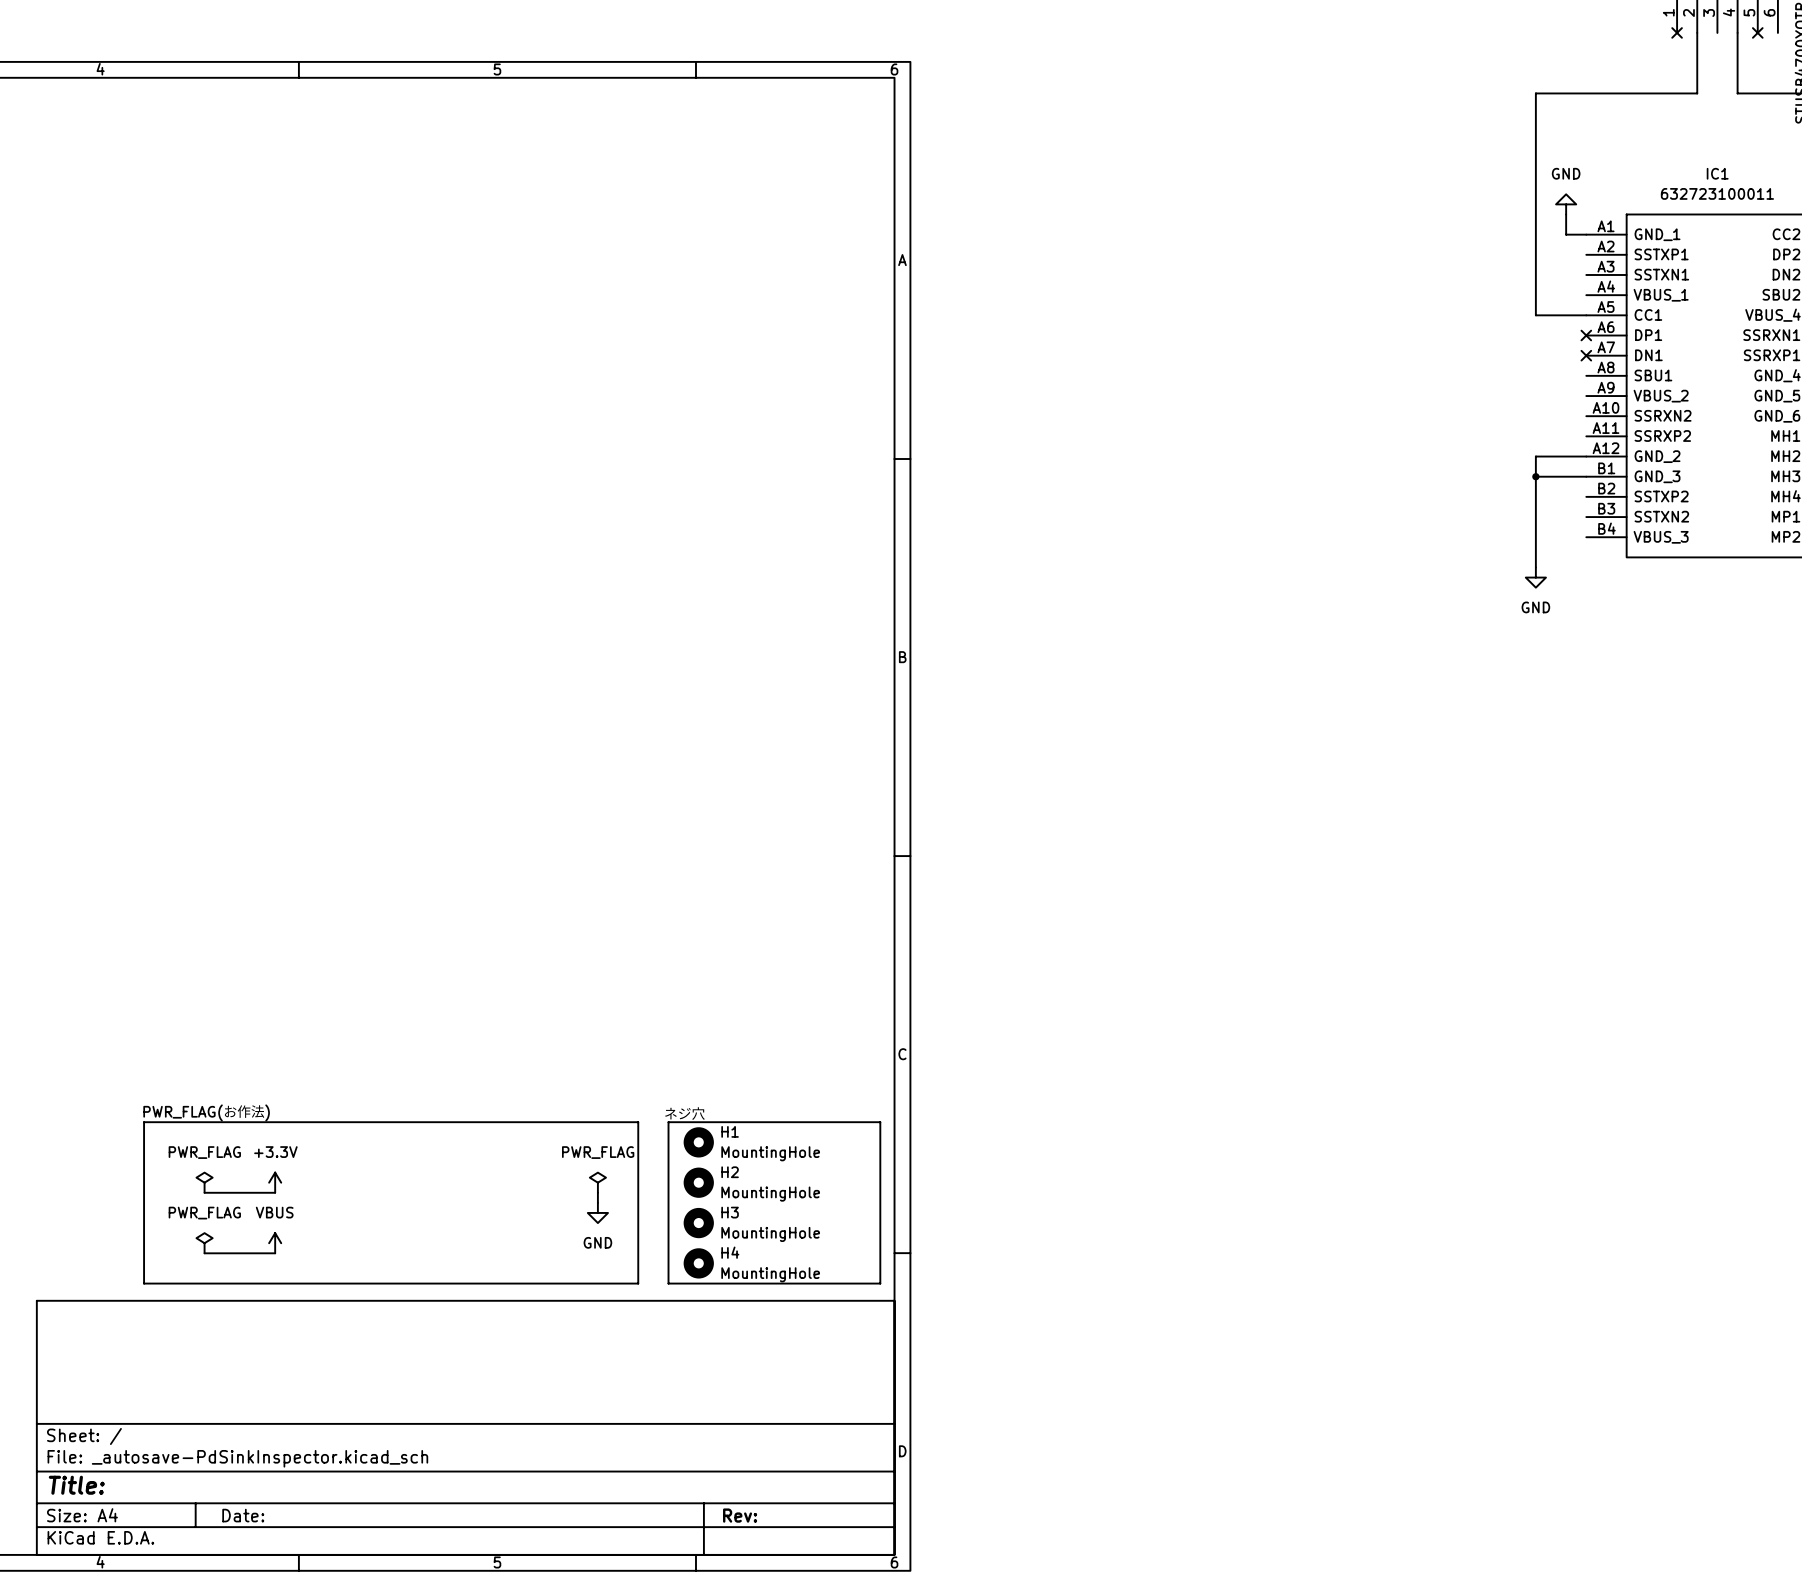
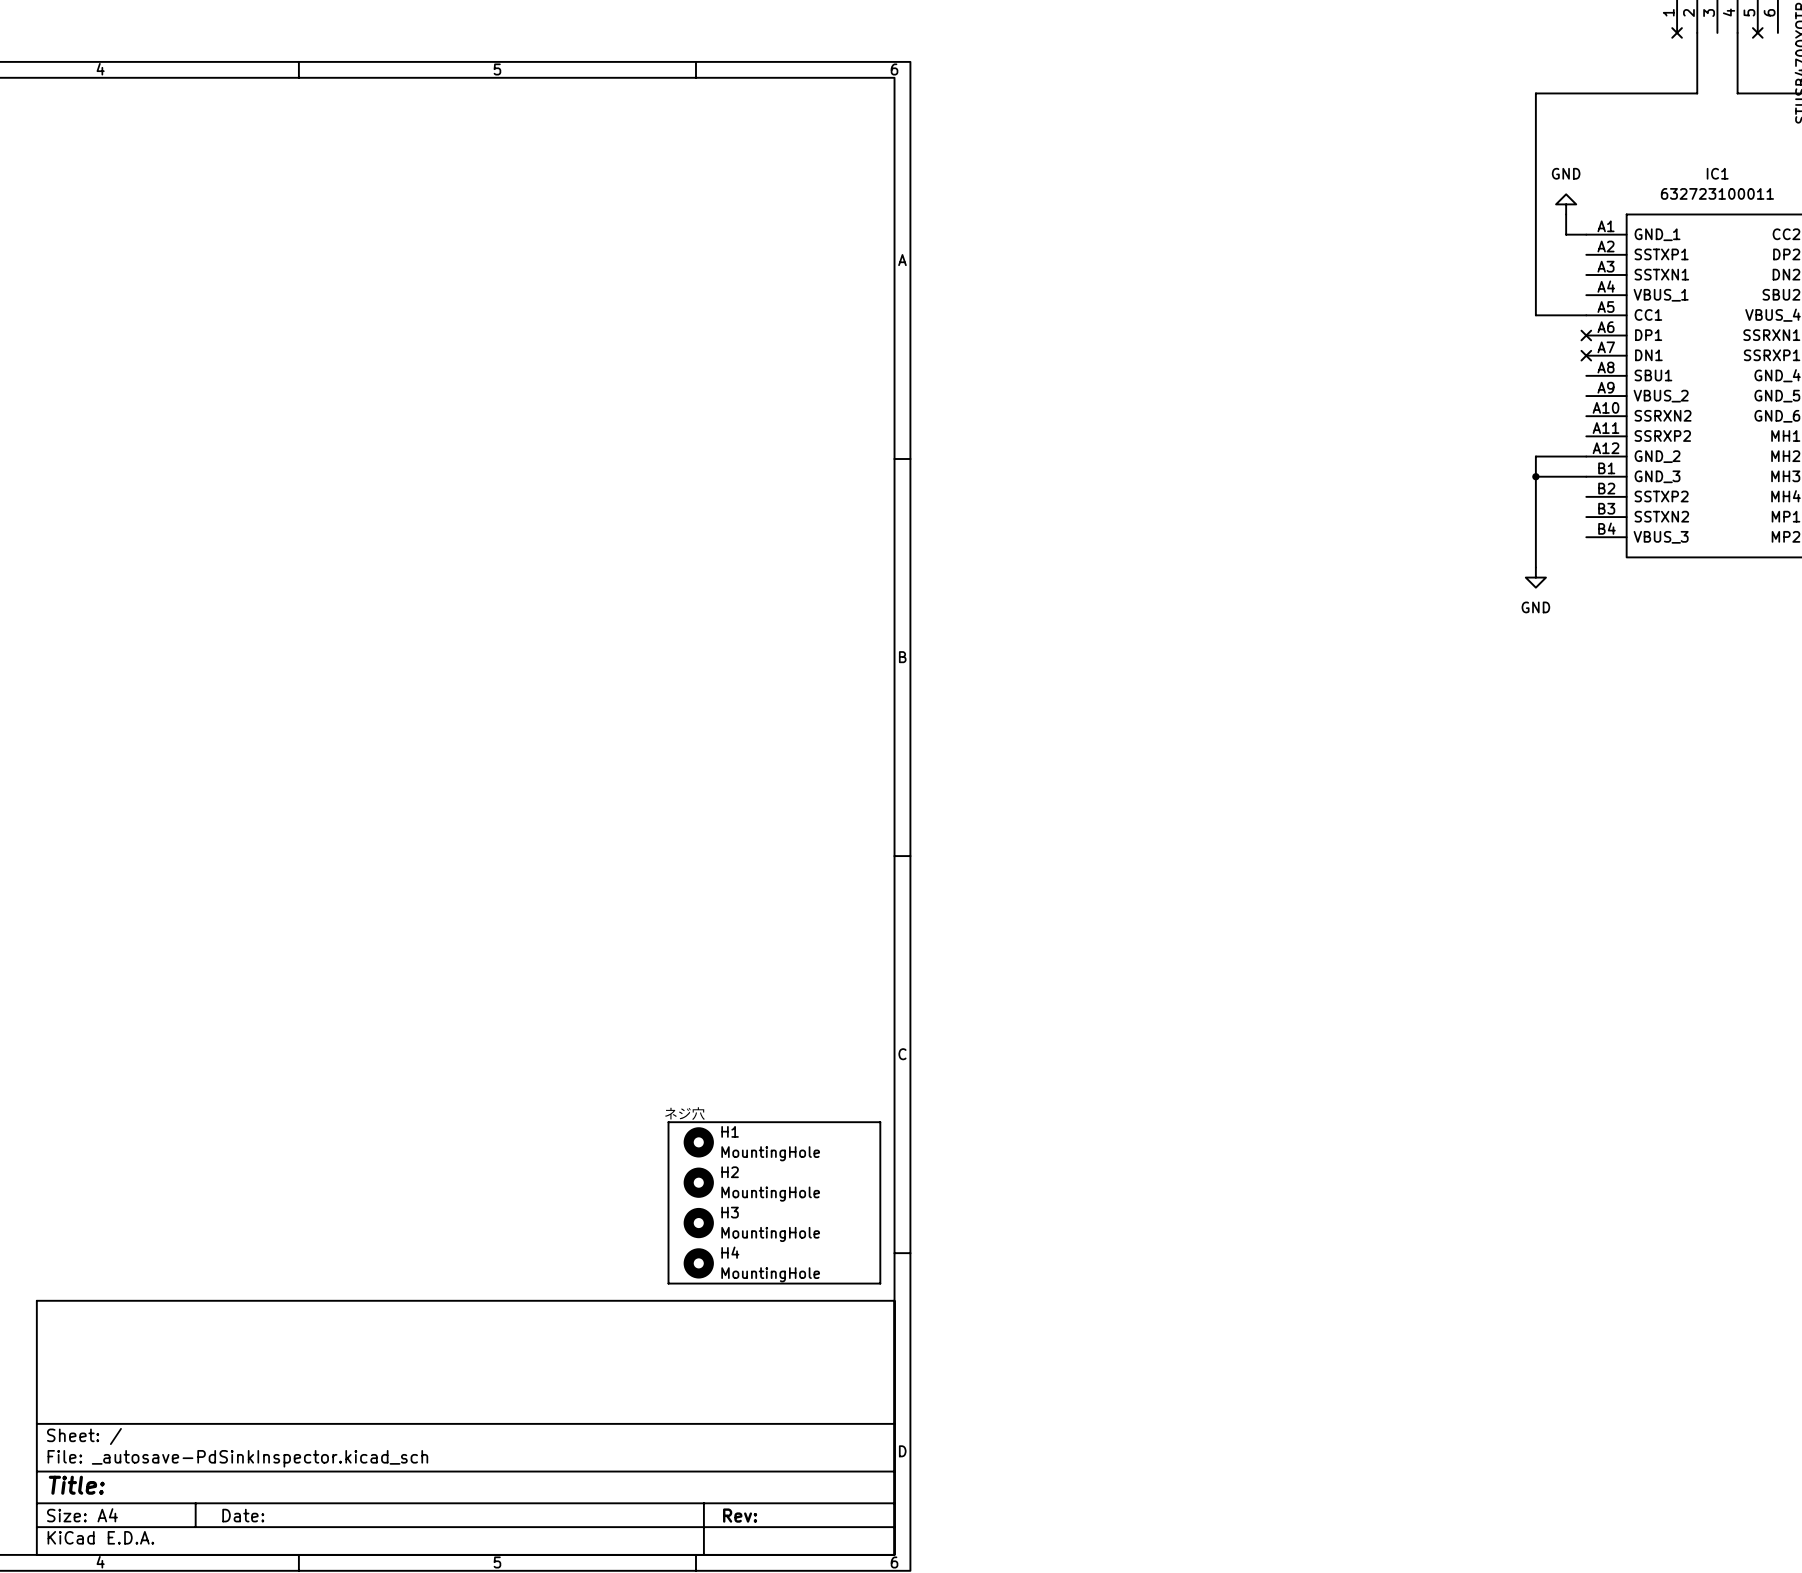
text: PWR_FLAG(お作法) (206, 1112) -> none
line: (144, 1122) (638, 1122) (638, 1283) (144, 1283) (144, 1122) -> none
power symbol: PWR_FLAG (204, 1182) -> none
power symbol: +3.3V (275, 1182) -> none
power symbol: PWR_FLAG (597, 1182) -> none
wire: (204, 1192) (275, 1192) -> none
wire: (597, 1192) (597, 1202) -> none
power symbol: GND (597, 1212) -> none
power symbol: PWR_FLAG (204, 1243) -> none
power symbol: VBUS (275, 1243) -> none
wire: (204, 1253) (275, 1253) -> none

